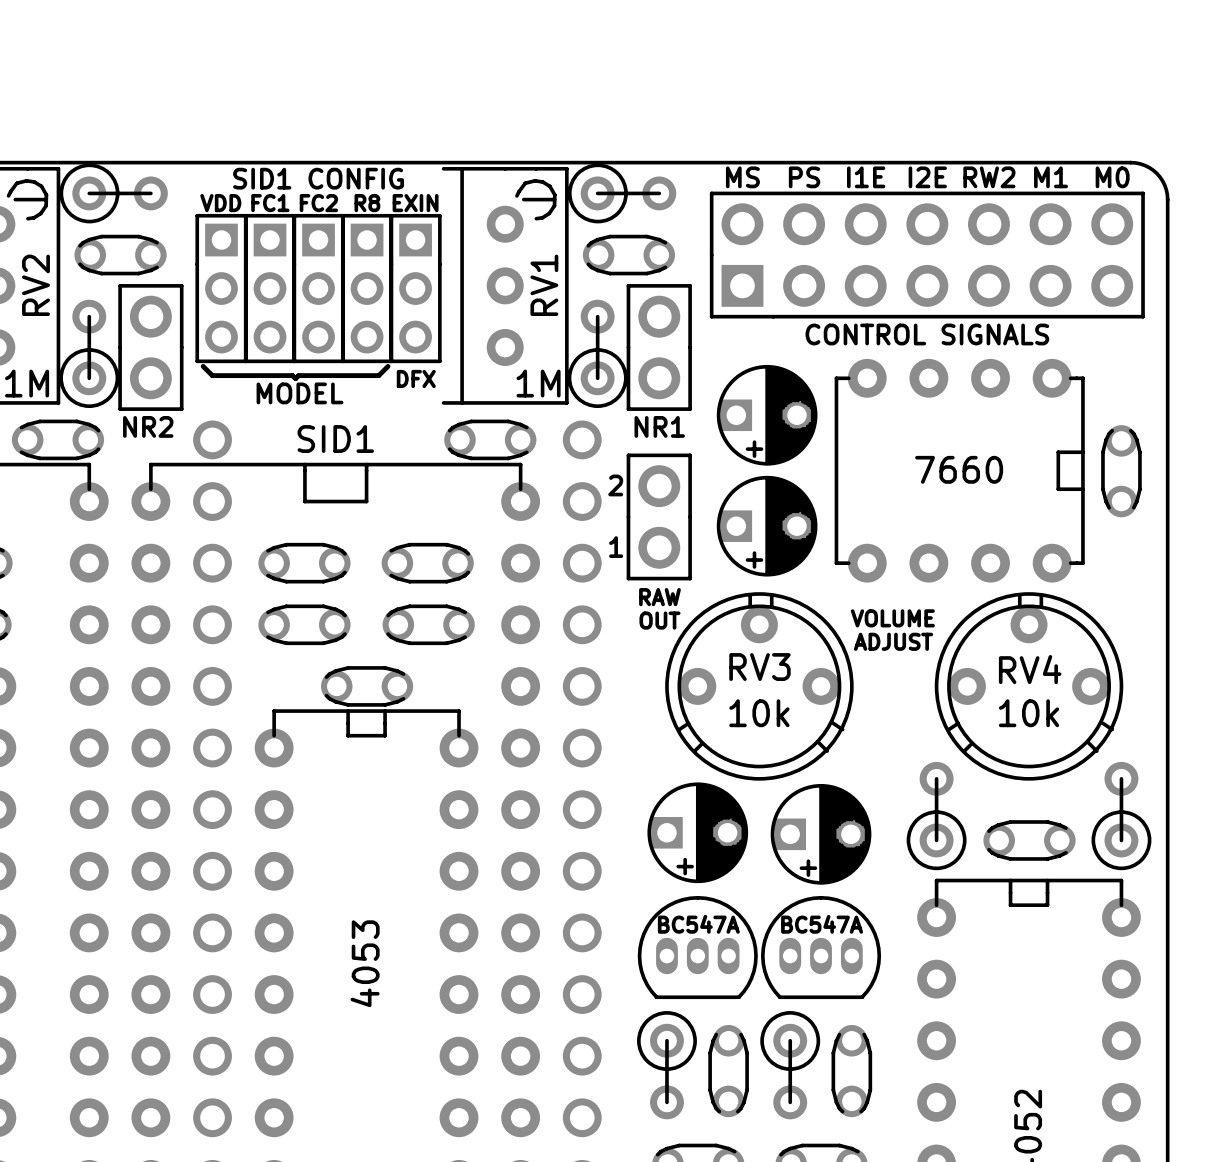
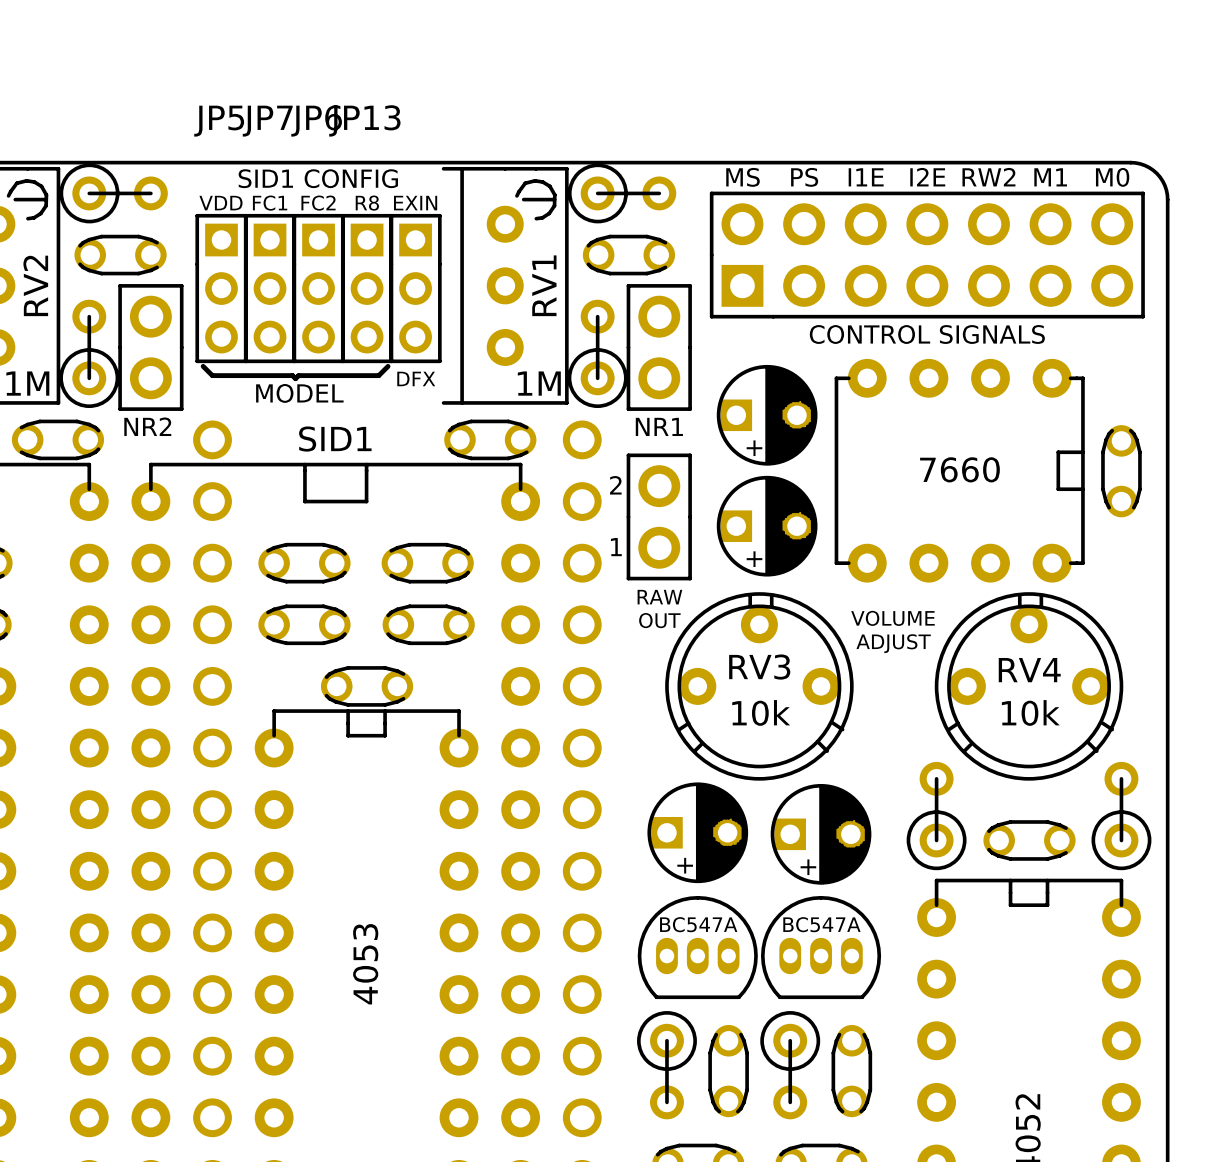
JP5 name: none -> JP5 (219, 121)
JP7 name: none -> JP7 (267, 121)
JP6 name: none -> JP6 (316, 120)
JP13 name: none -> JP13 (364, 120)

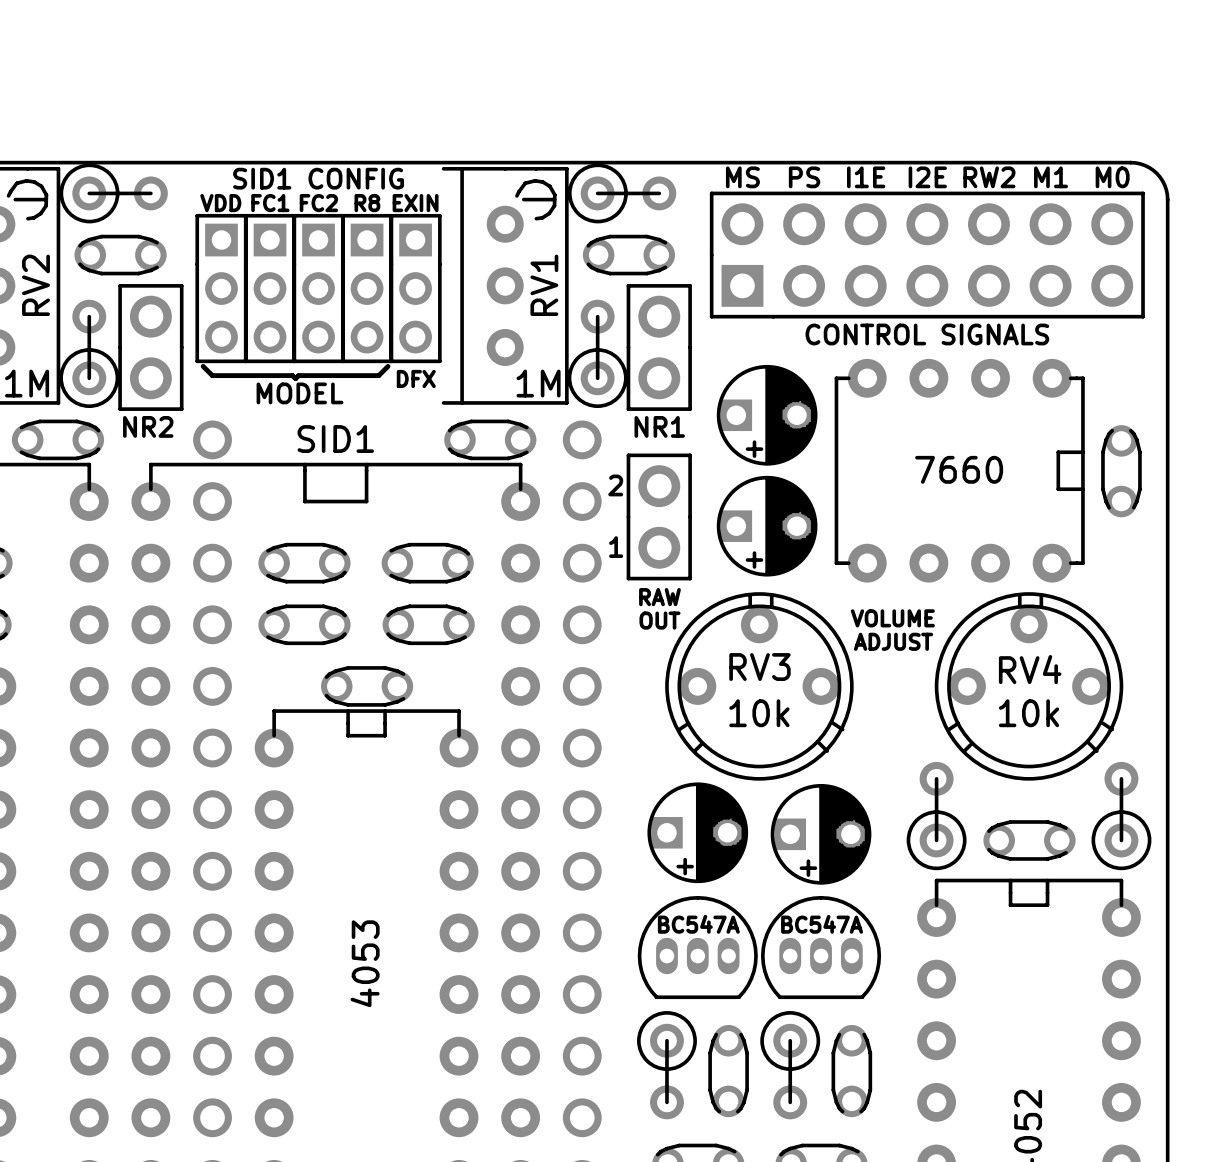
JP6 name: JP6 (316, 120) -> none
JP13 name: JP13 (364, 120) -> none
JP5 name: JP5 (219, 121) -> none
JP7 name: JP7 (267, 121) -> none

